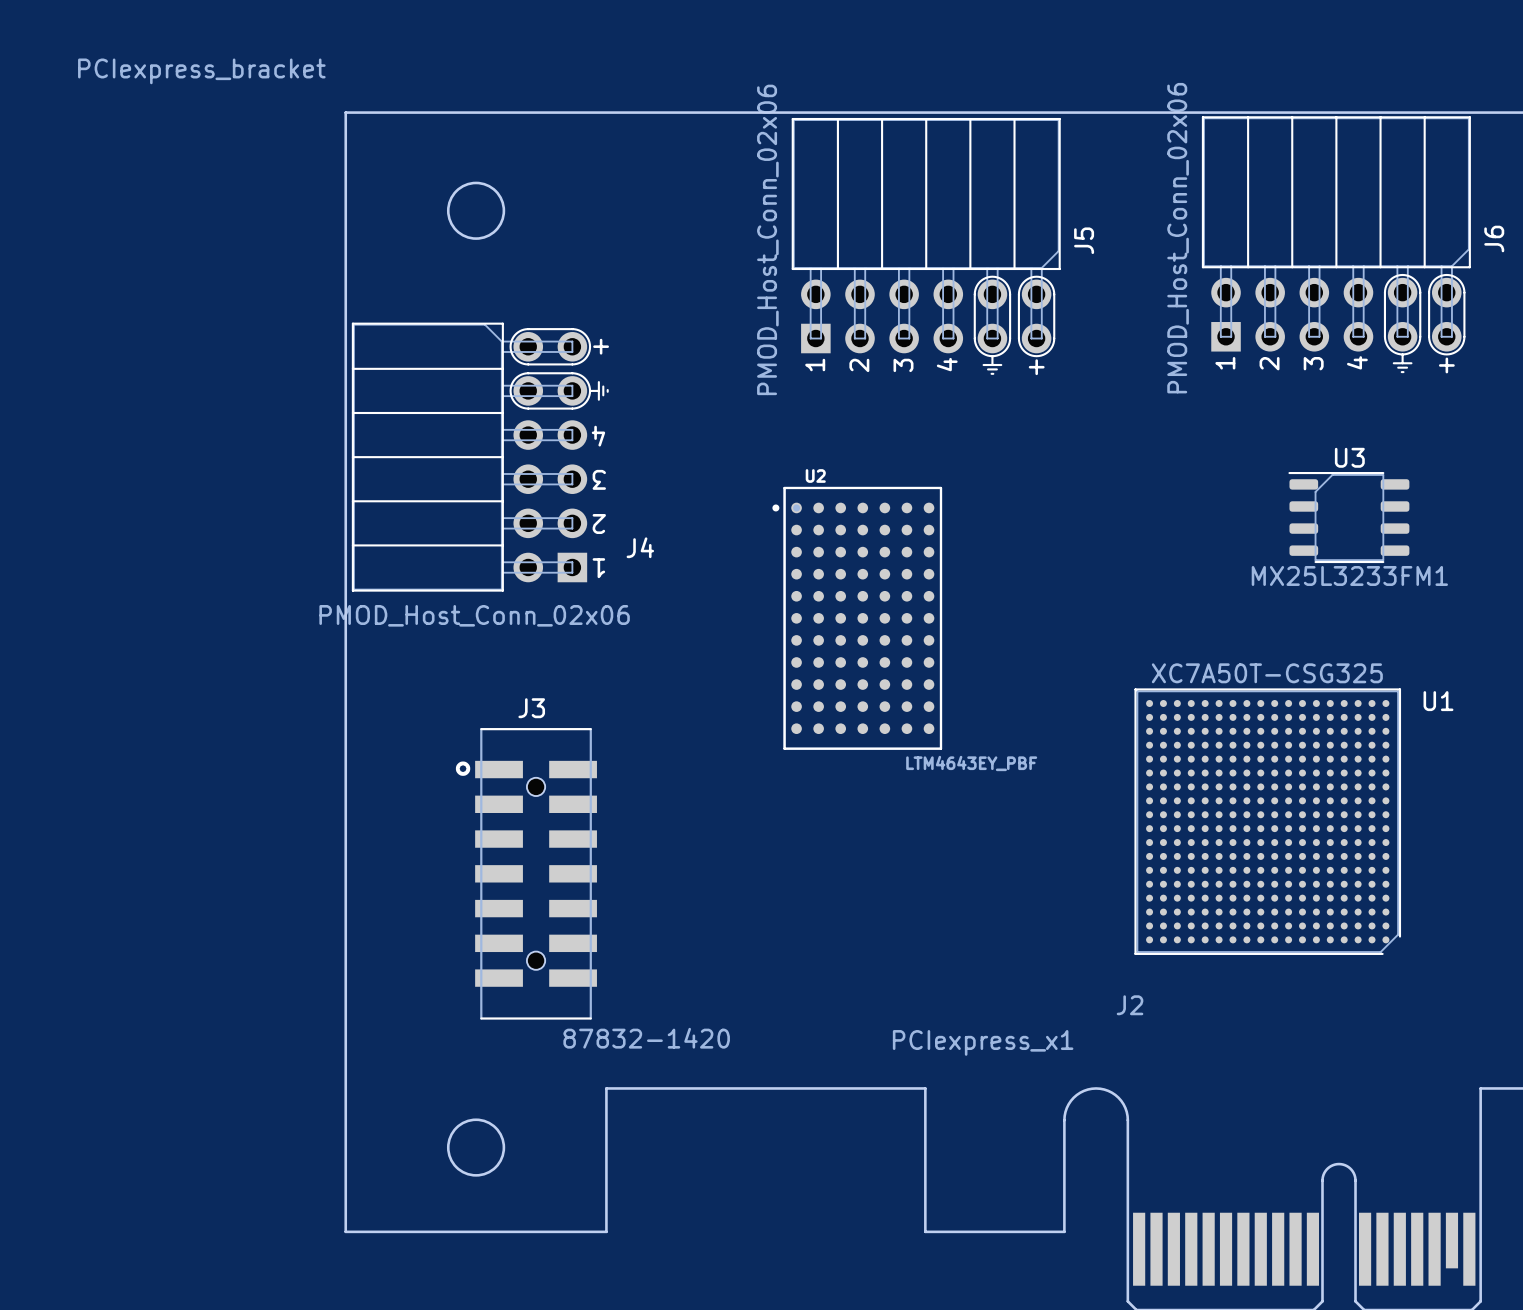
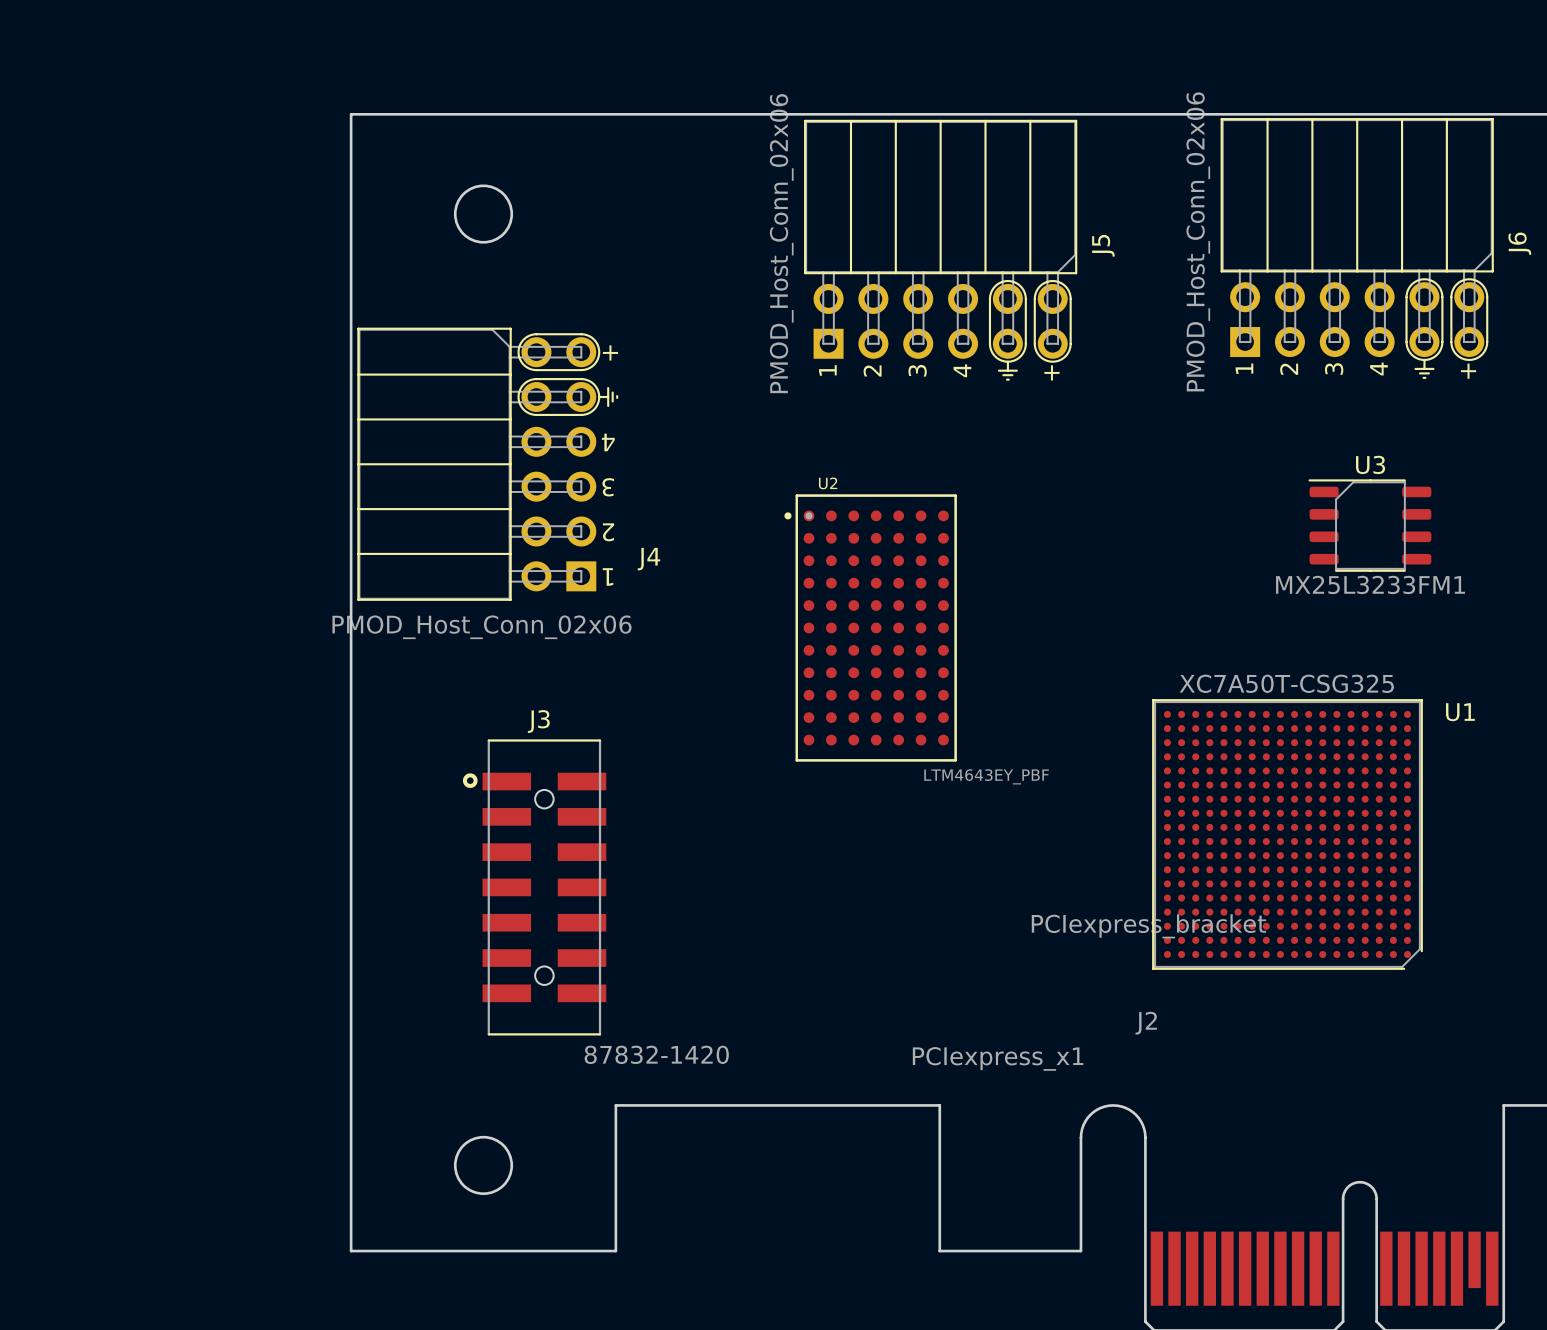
drawing: [78, 58, 326, 85] -> none
drawing: none -> [1031, 914, 1267, 939]

